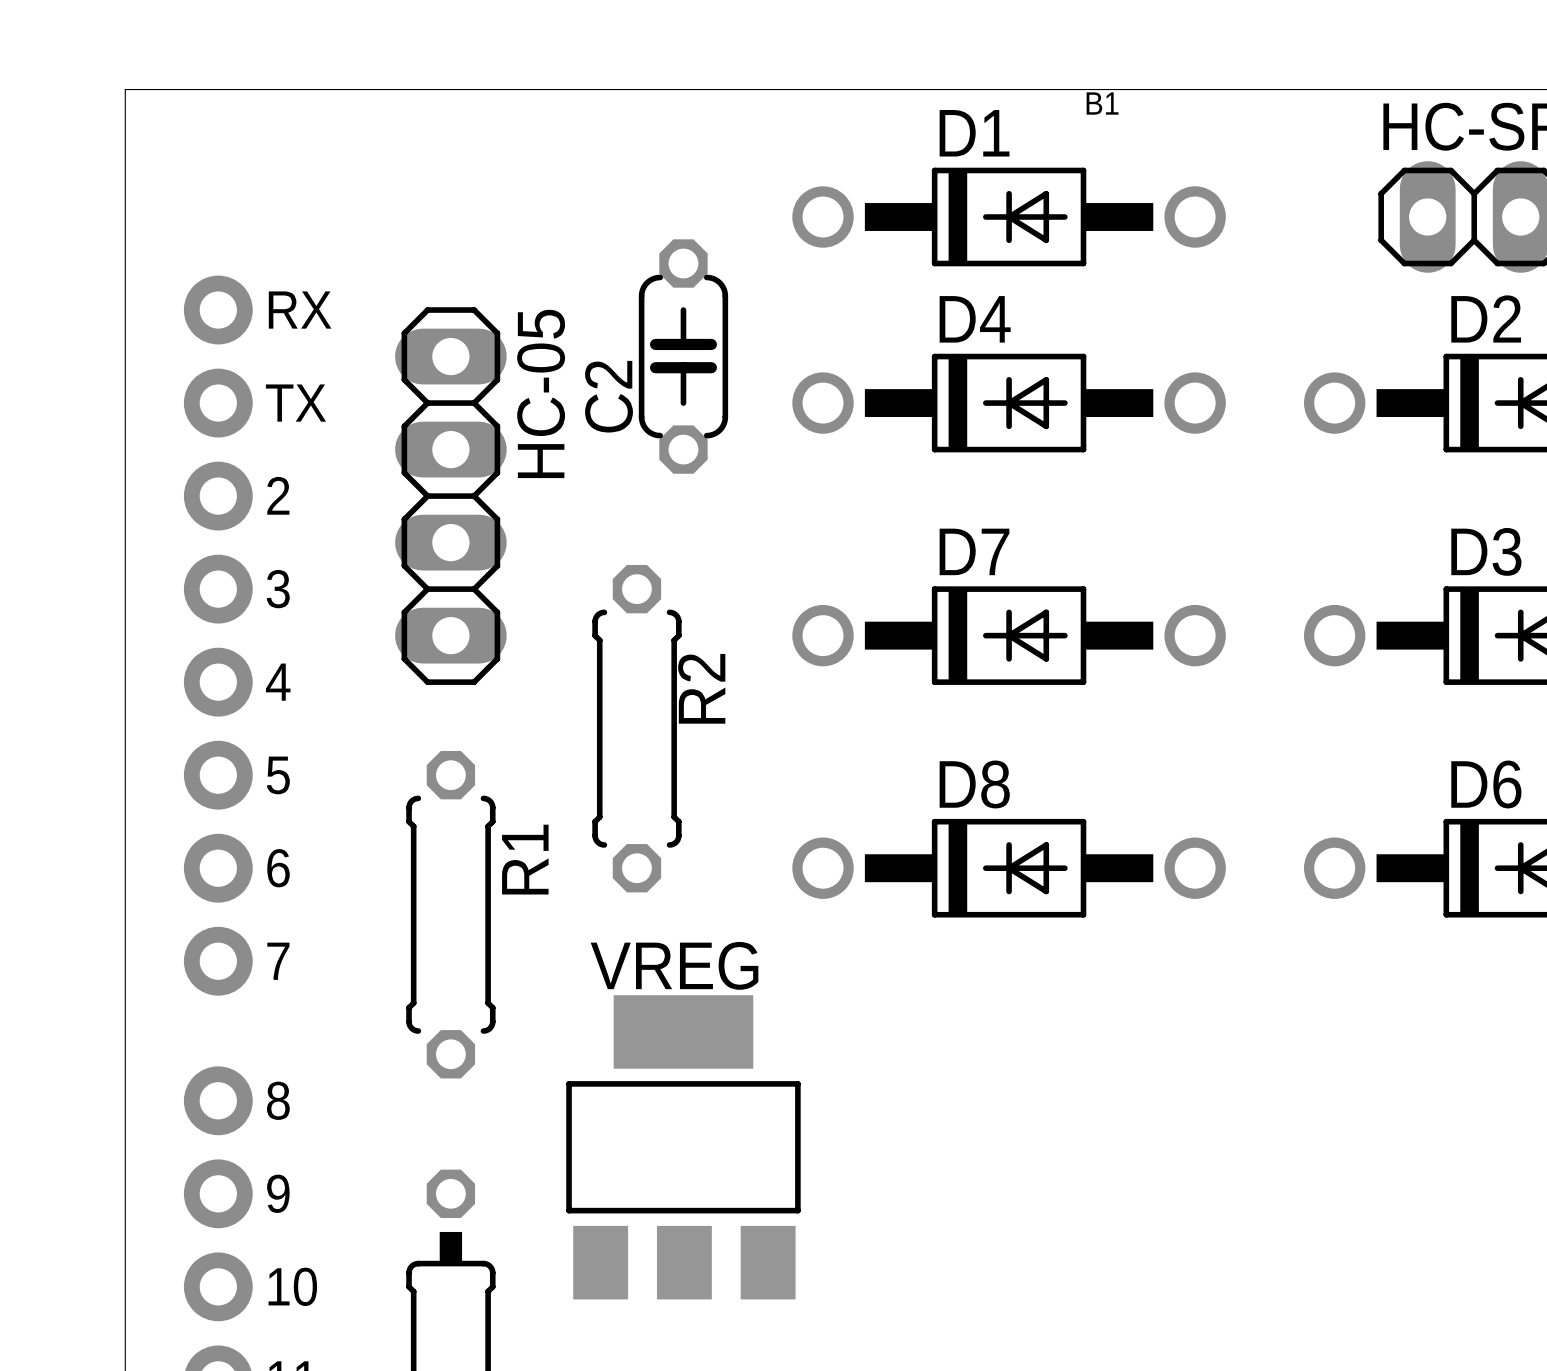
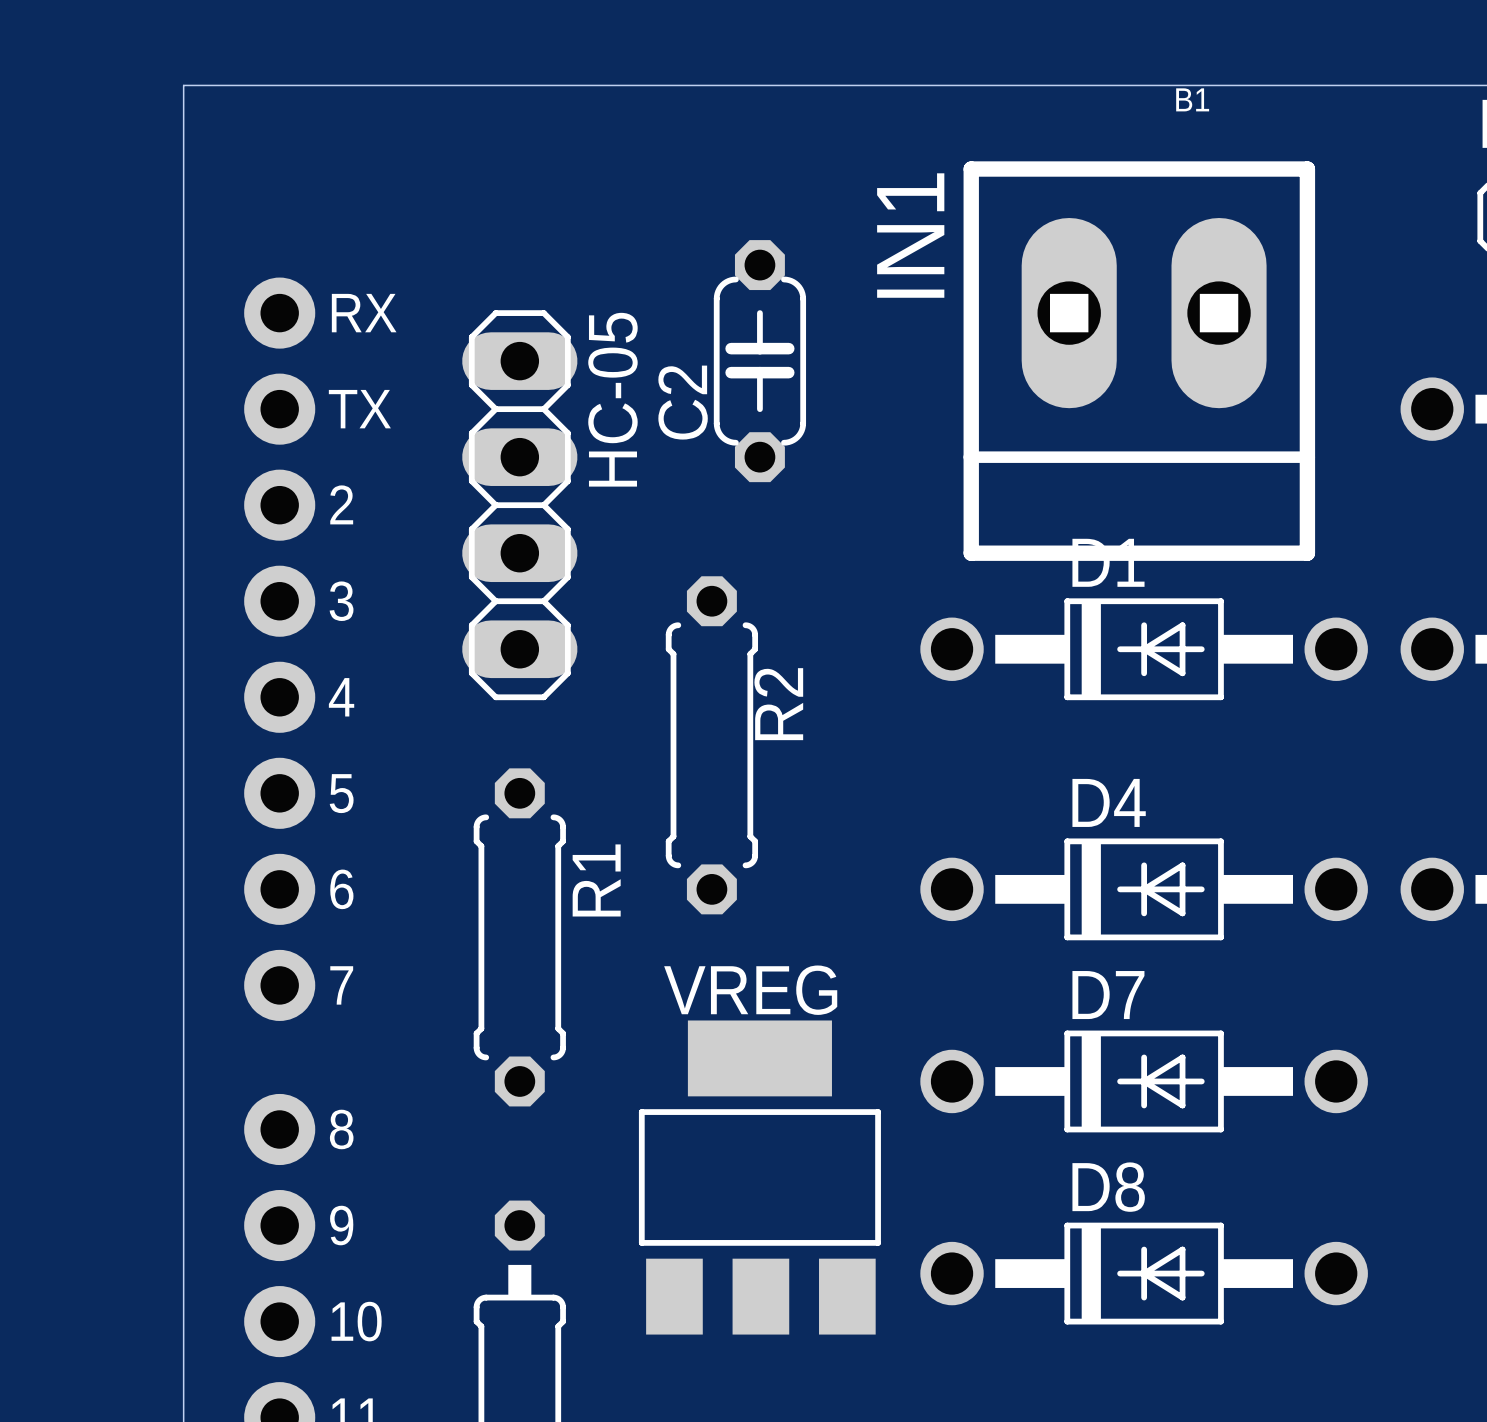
D1 position: (1009, 217) -> (1144, 649)
IN1: none -> (1139, 361)
D4 position: (1009, 403) -> (1144, 889)
D7 position: (1009, 635) -> (1144, 1081)
D8 position: (1009, 868) -> (1144, 1273)

